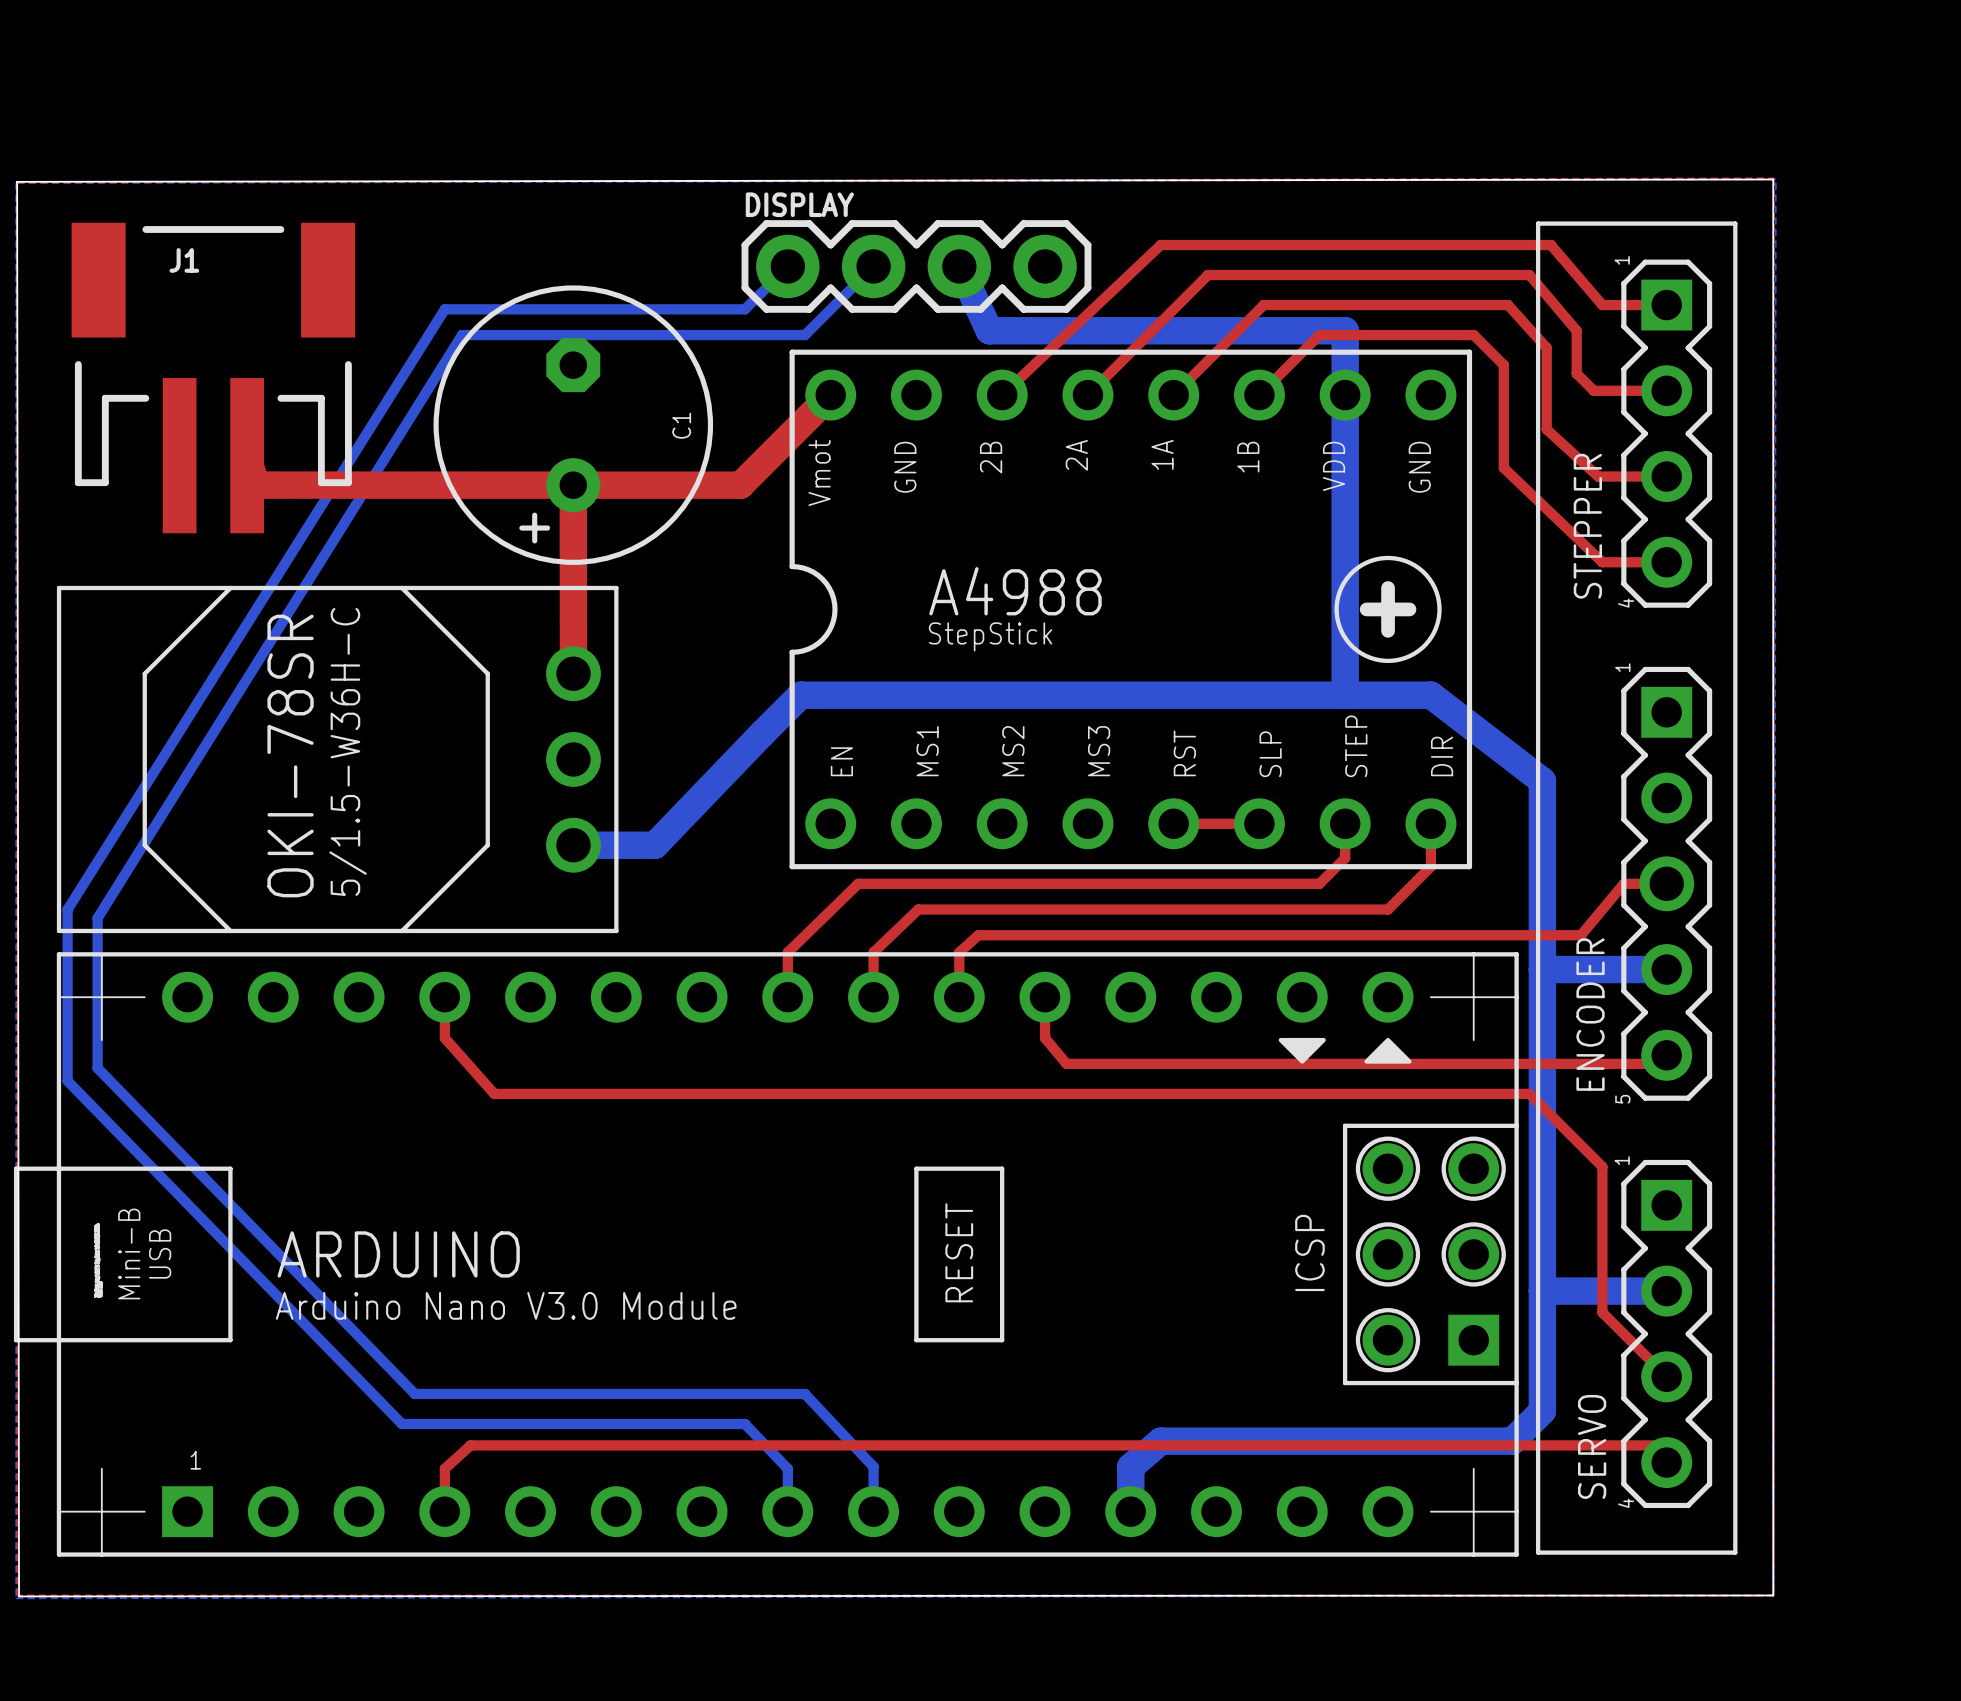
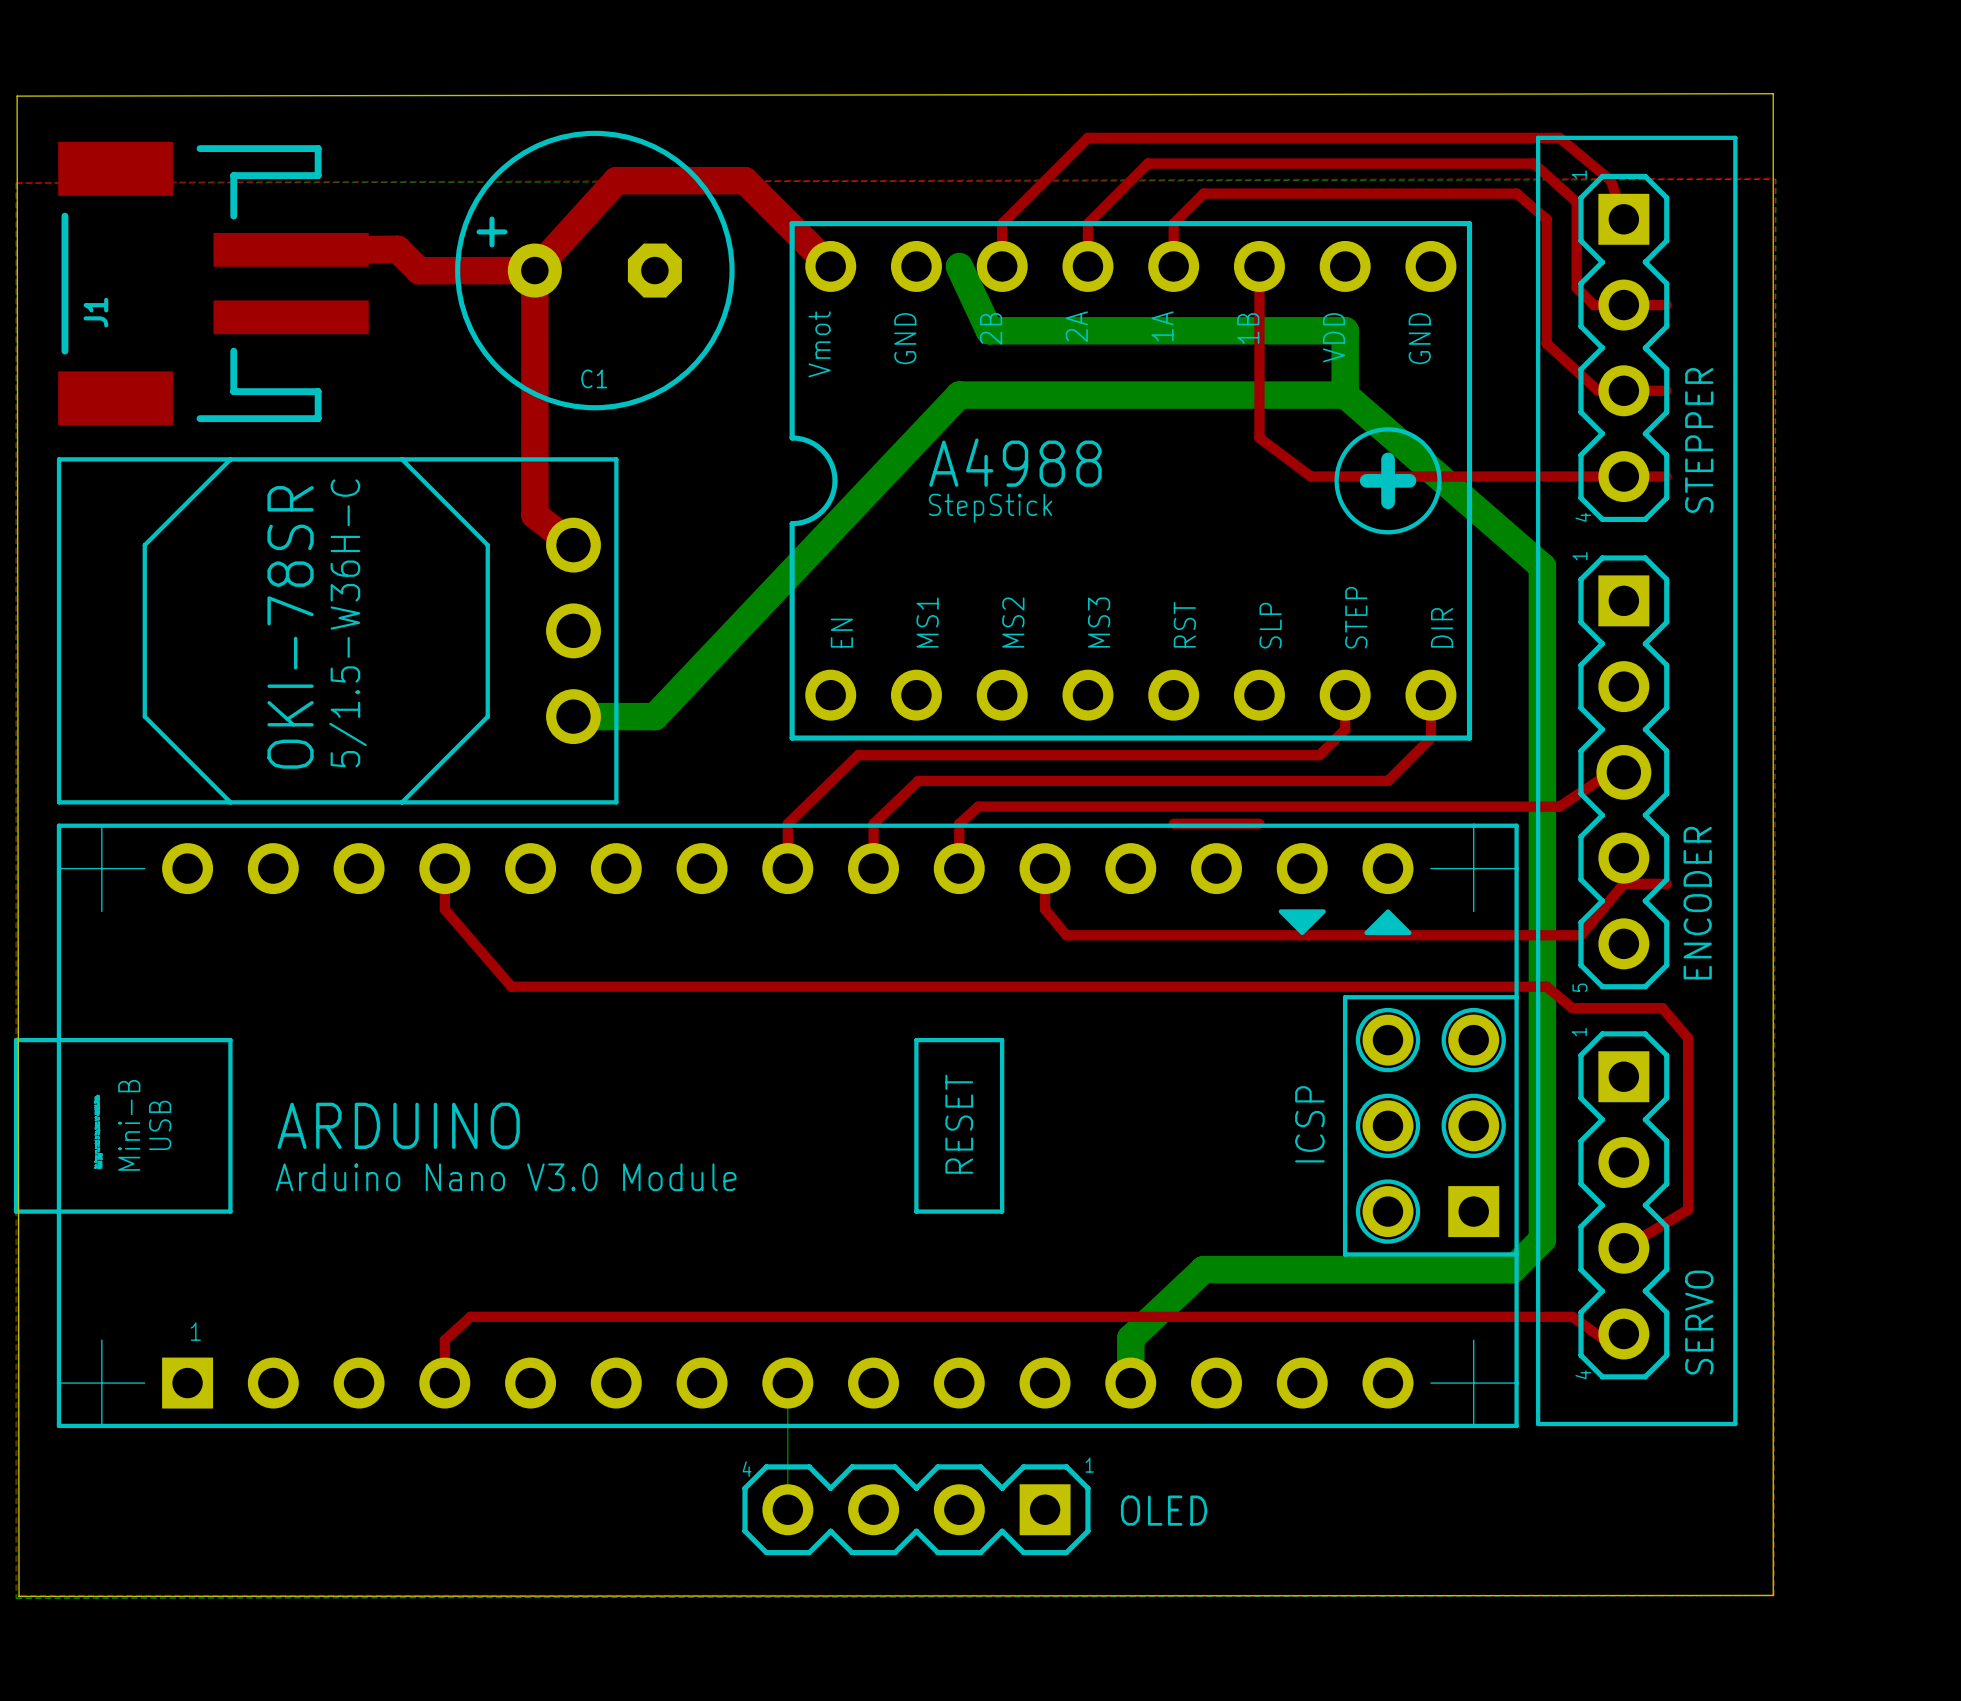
board edge: (1773, 179) (17, 181) (19, 1596) -> (1773, 179) (1773, 93) (17, 96) (19, 1596)
top track: none -> (1623, 219) (1610, 180) (1559, 137) (1087, 137) (1002, 223) (1002, 266)
line: (1538, 223) (1735, 223) -> (1538, 223) (1538, 137) (1735, 137) (1735, 223)
top track: none -> (291, 249) (397, 249) (419, 270) (534, 270)
bottom track: (787, 266) (744, 309) (444, 309) (67, 909) (67, 1081) (402, 1423) (744, 1423) (787, 1468) (787, 1511) -> none
top track: none -> (830, 266) (744, 180) (616, 180) (534, 270)
bottom track: (873, 266) (805, 335) (462, 335) (97, 918) (97, 1068) (414, 1393) (805, 1393) (873, 1466) (873, 1511) -> none
DISPLAY: (916, 266) -> none
top track: none -> (534, 270) (534, 515) (573, 545)
top track: (1602, 305) (1550, 245) (1160, 245) (1002, 395) -> (1602, 305) (1593, 305) (1576, 287) (1576, 202) (1533, 163) (1147, 163) (1087, 223) (1087, 266)
J1 rotation: 0° (213, 378) -> 90° counterclockwise (213, 283)
top track: (1598, 390) (1593, 390) (1576, 373) (1576, 330) (1529, 275) (1208, 275) (1087, 395) -> (1598, 390) (1546, 343) (1546, 219) (1516, 193) (1203, 193) (1173, 223) (1173, 266)
top track: (830, 395) (740, 485) (256, 485) (247, 455) -> none
top track: (1173, 395) (1263, 305) (1508, 305) (1546, 347) (1546, 429) (1598, 476) -> (1259, 266) (1259, 437) (1310, 476) (1598, 476)
top track: (1259, 395) (1319, 335) (1473, 335) (1503, 365) (1503, 467) (1602, 562) (1666, 562) -> none
bottom track: (1345, 395) (1345, 695) -> none
C1 rotation: 0° (573, 425) -> 90° clockwise (594, 270)
STEPPER position: (1666, 433) -> (1623, 347)
top track: (573, 485) (573, 673) -> none
STEPPER name position: STEPPER (1587, 526) -> STEPPER (1699, 440)
A4988 position: (1130, 609) -> (1130, 480)
OKI-78SR position: (337, 759) -> (337, 630)
top track: none -> (1623, 772) (1610, 772) (1559, 806) (978, 806) (959, 823) (959, 868)
bottom track: (1542, 780) (1430, 695) (800, 695) (654, 845) (573, 845) -> (1542, 780) (1542, 566) (1345, 395) (959, 395) (654, 716) (573, 716)
top track: (1345, 823) (1345, 858) (1319, 883) (858, 883) (787, 952) (787, 997) (787, 995) -> (1345, 695) (1345, 729) (1319, 755) (858, 755) (787, 823) (787, 868) (787, 866)
top track: (1430, 823) (1430, 866) (1388, 909) (918, 909) (873, 952) (873, 997) (875, 997) -> (1430, 695) (1430, 738) (1388, 780) (918, 780) (873, 823) (873, 868) (875, 868)
top track: none -> (444, 868) (444, 909) (511, 986) (1546, 986) (1572, 1008) (1662, 1008) (1688, 1038) (1688, 1209) (1623, 1248)
ENCODER position: (1666, 883) -> (1623, 772)
top track: (1066, 935) (978, 935) (959, 952) (959, 997) -> (1066, 935) (1045, 909) (1045, 868)
bottom track: (1542, 969) (1666, 969) -> none
top track: (444, 997) (444, 1038) (494, 1093) (1529, 1093) (1602, 1166) (1602, 1312) (1666, 1376) -> none
top track: (1045, 997) (1045, 1038) (1066, 1063) (1666, 1063) (1666, 1055) -> none
ENCODER name position: ENCODER (1590, 1014) -> ENCODER (1697, 903)
bottom track: (1542, 1239) (1542, 1411) (1512, 1441) (1160, 1441) (1130, 1466) (1130, 1511) -> (1542, 1239) (1512, 1269) (1203, 1269) (1130, 1338) (1130, 1383)
ARDUINO position: (766, 1254) -> (766, 1125)
bottom track: (1542, 1291) (1666, 1291) -> none
top track: none -> (1623, 1333) (1602, 1338) (1572, 1316) (470, 1316) (444, 1340) (444, 1383)
SERVO position: (1666, 1333) -> (1623, 1205)
bottom track: none -> (787, 1383) (787, 1509)
line: (1538, 1423) (1538, 1552) (1735, 1552) (1735, 1423) -> (1538, 1423) (1735, 1423)
SERVO name position: SERVO (1592, 1446) -> SERVO (1699, 1322)
top track: (1666, 1462) (1658, 1445) (470, 1445) (444, 1468) (444, 1511) -> none
OLED: none -> (916, 1509)

